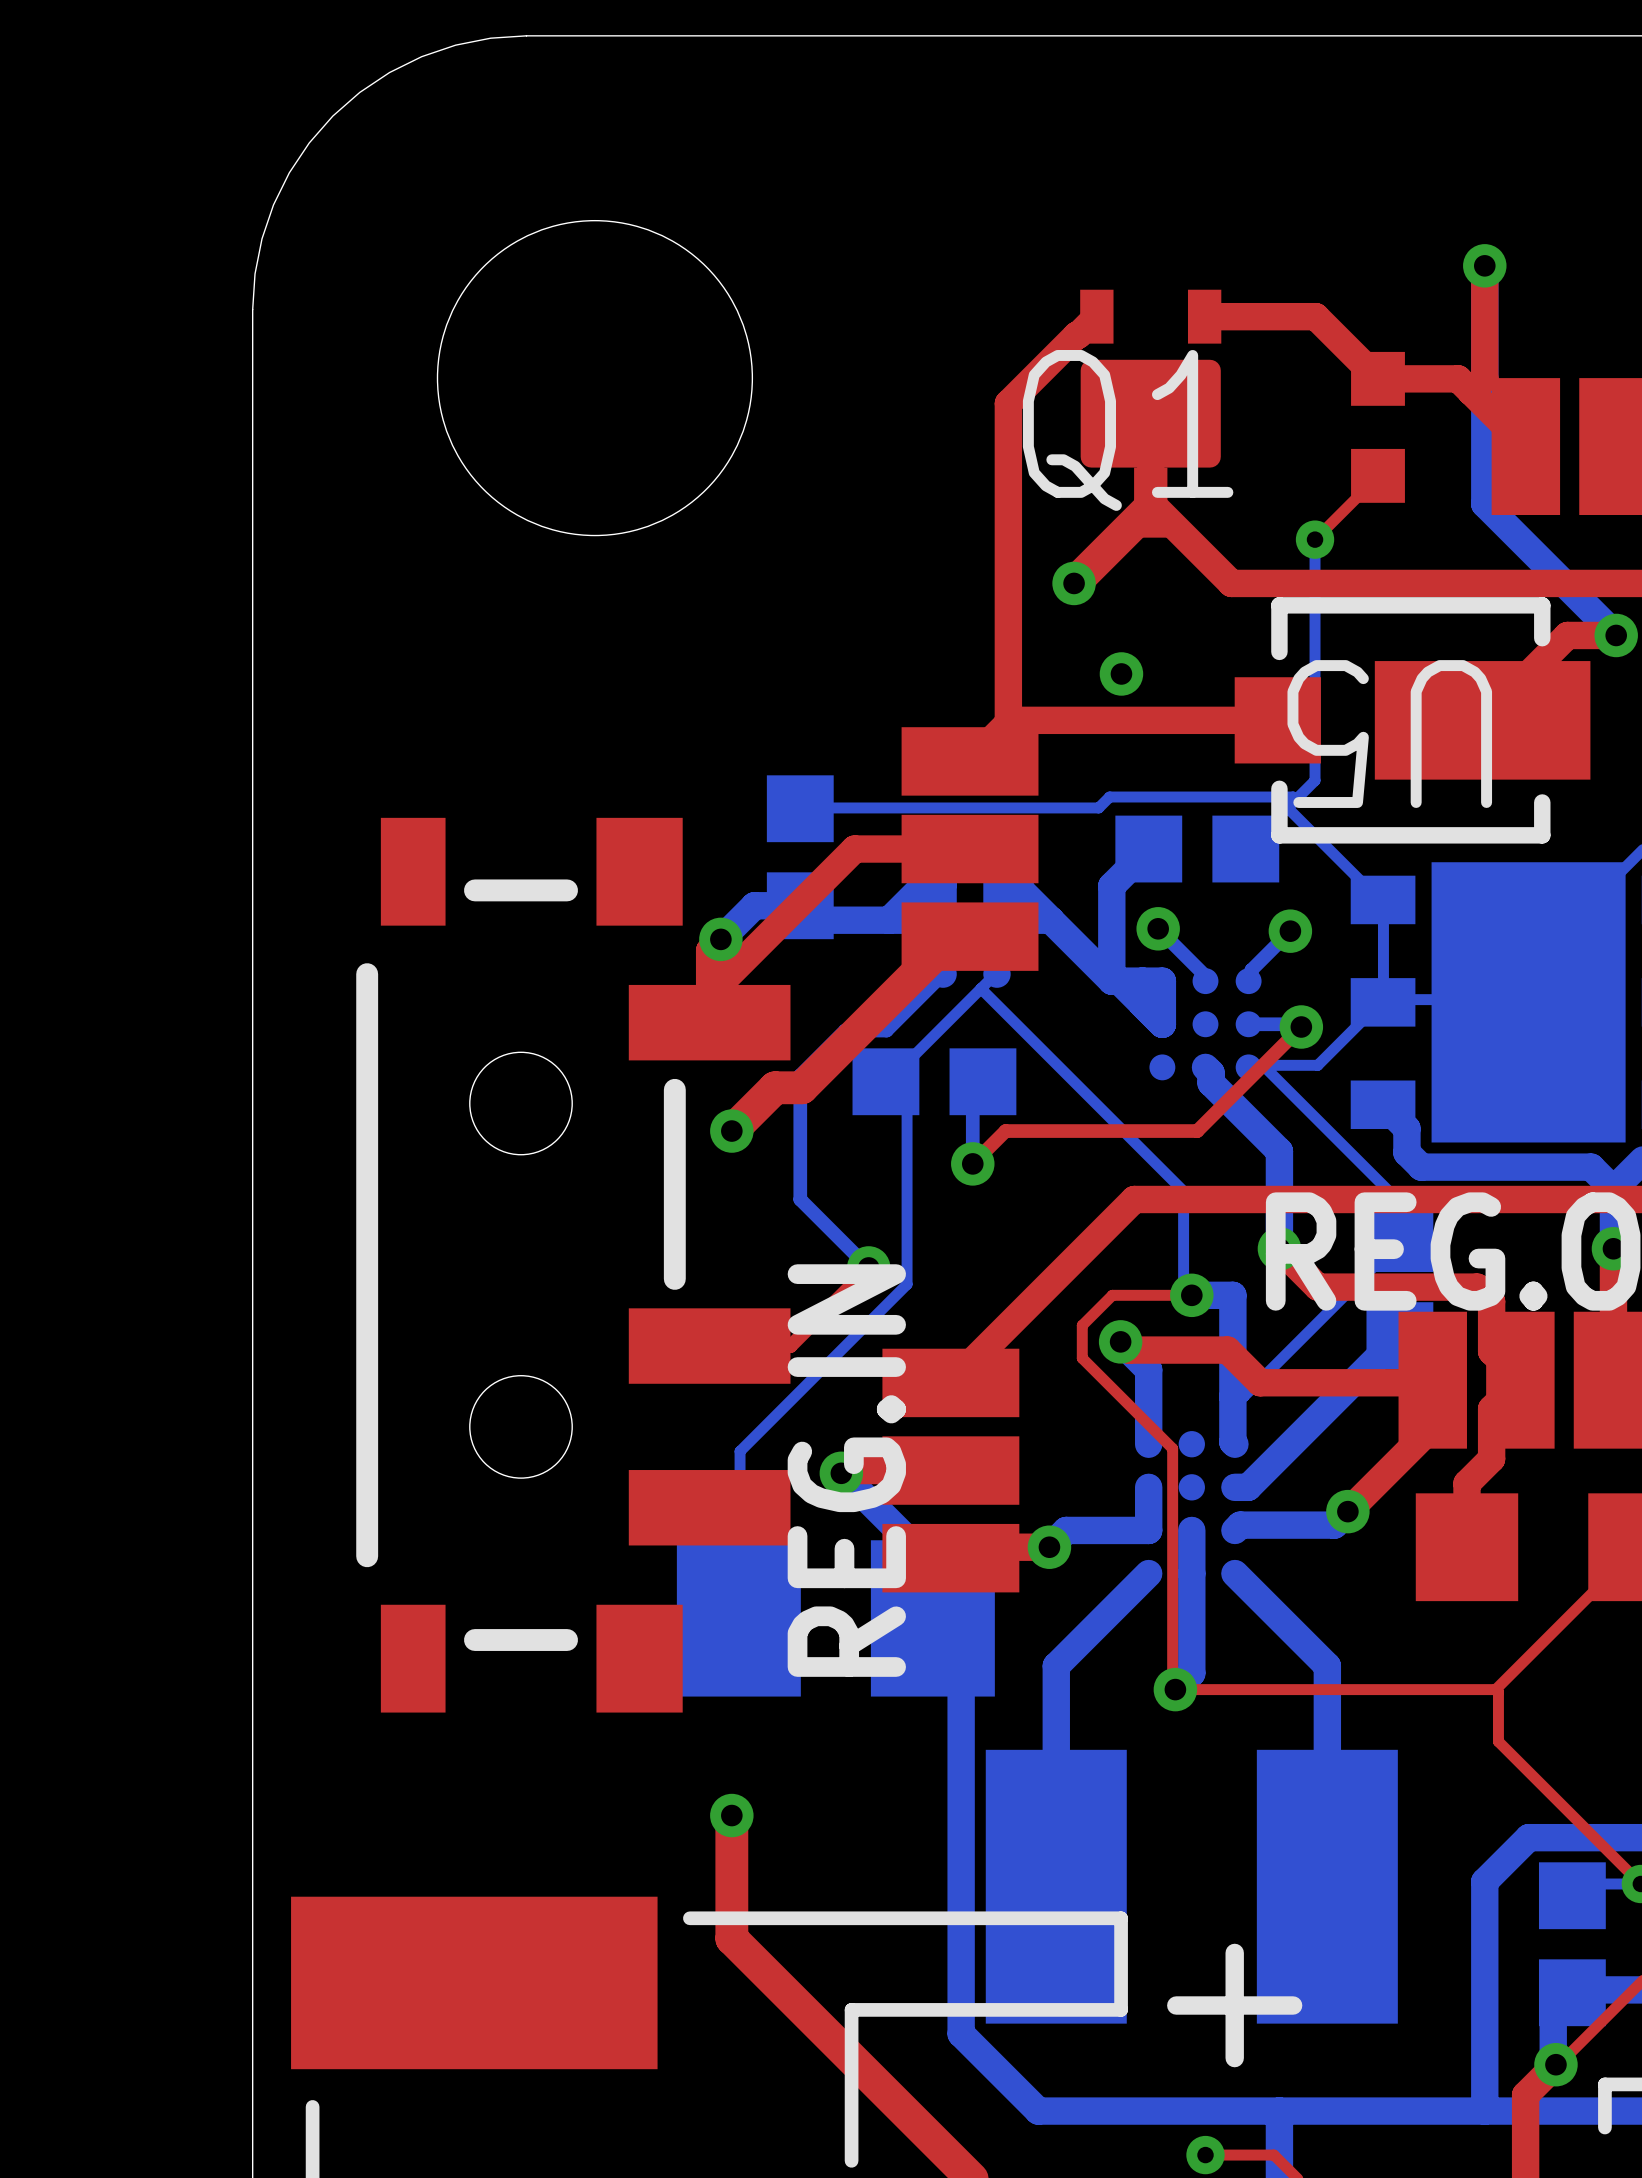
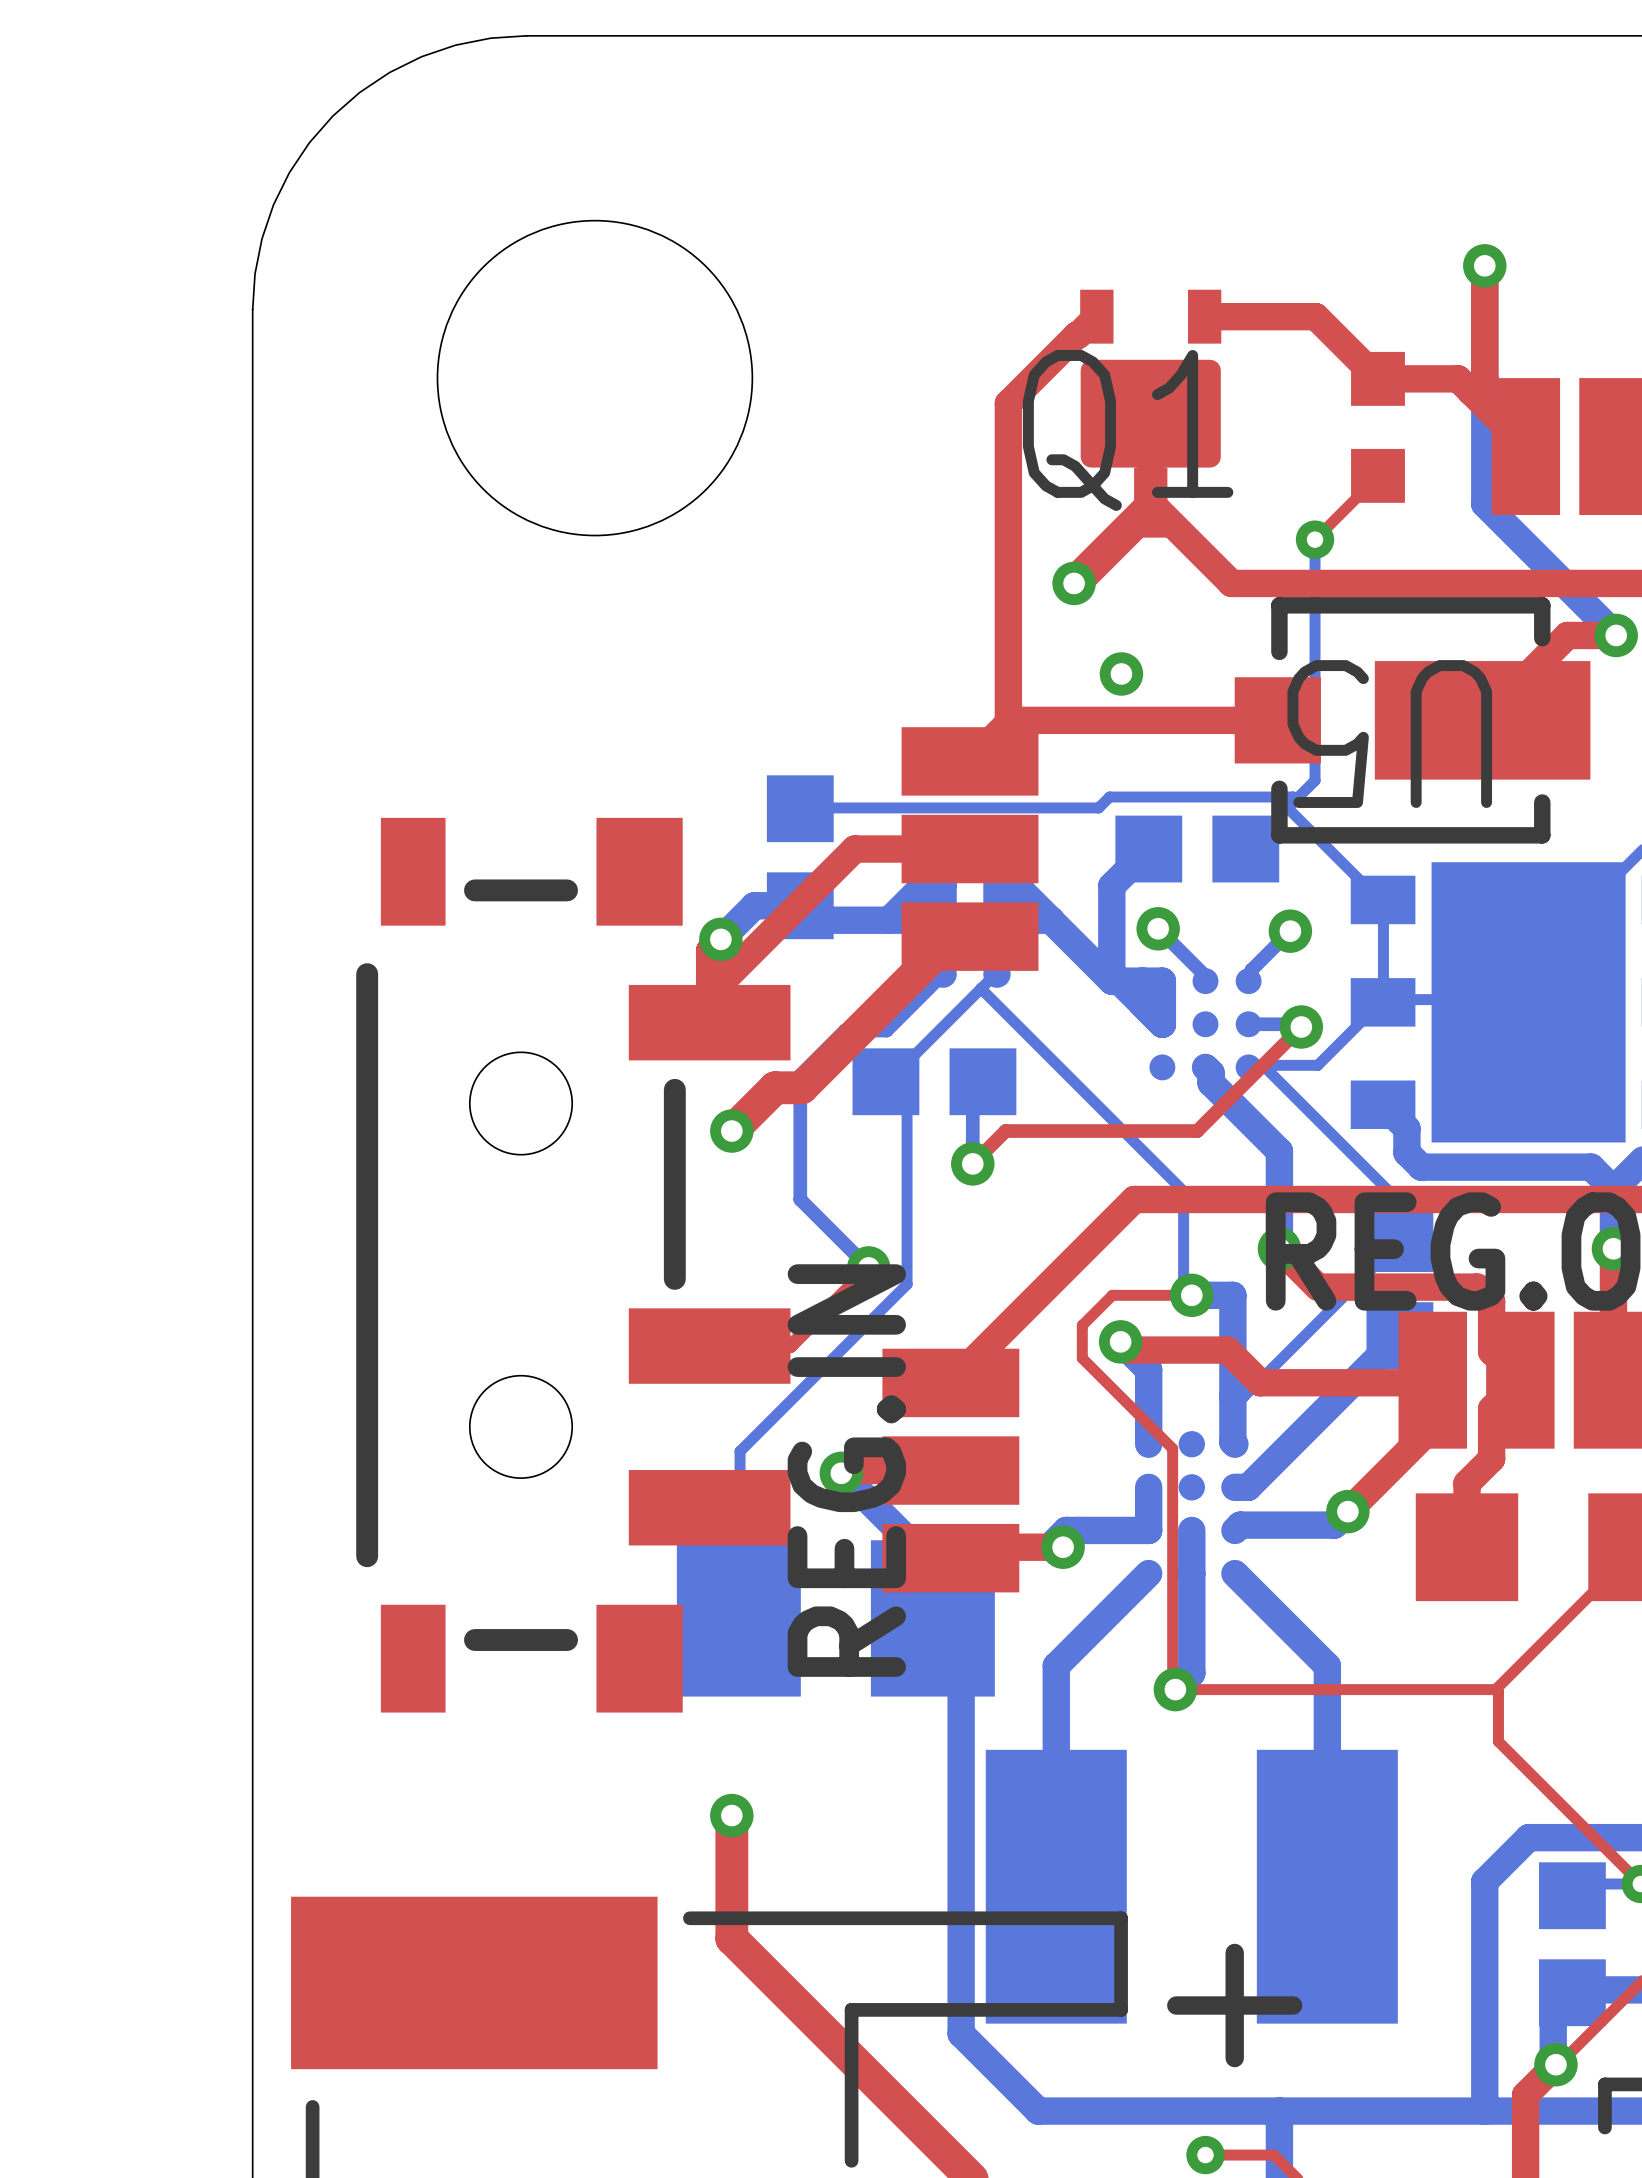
via position: (1049, 1547) -> (1063, 1547)

